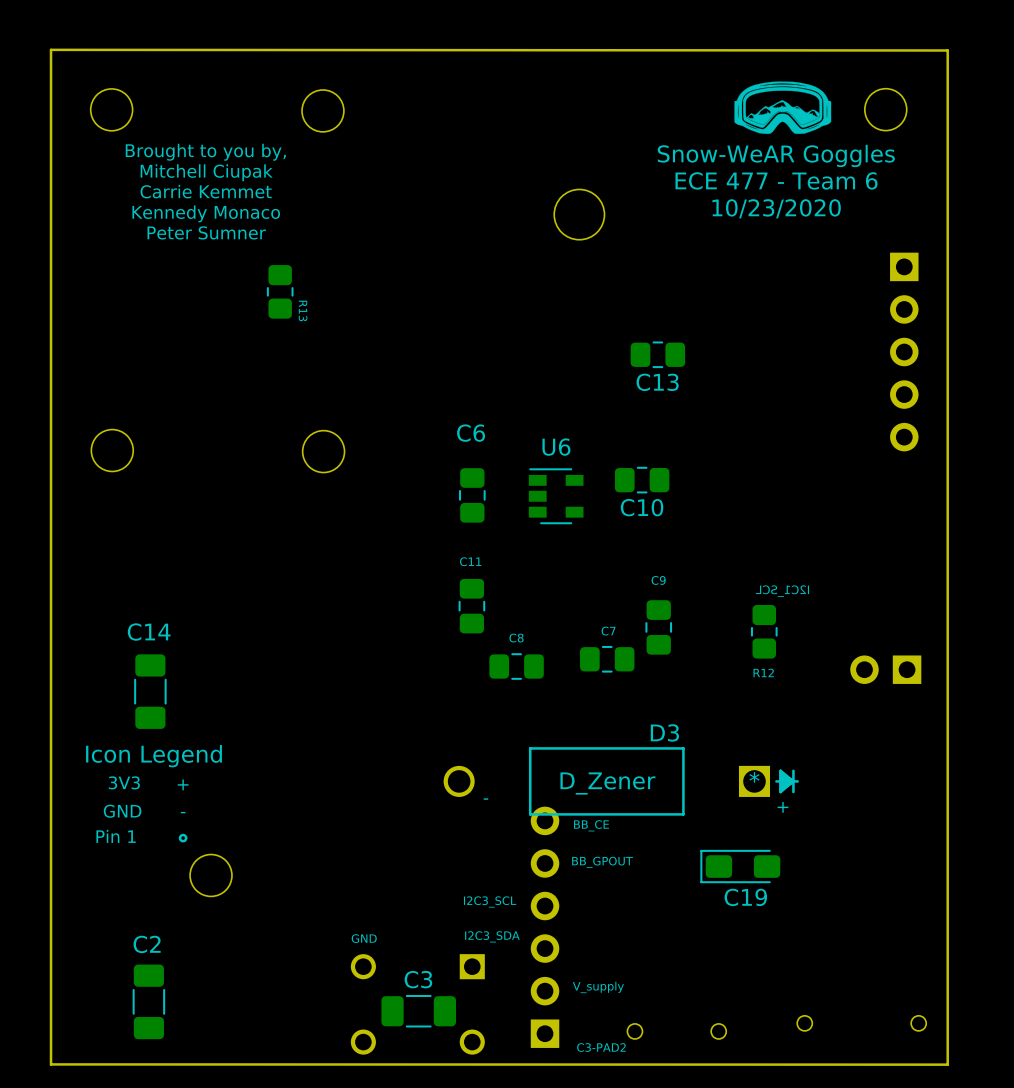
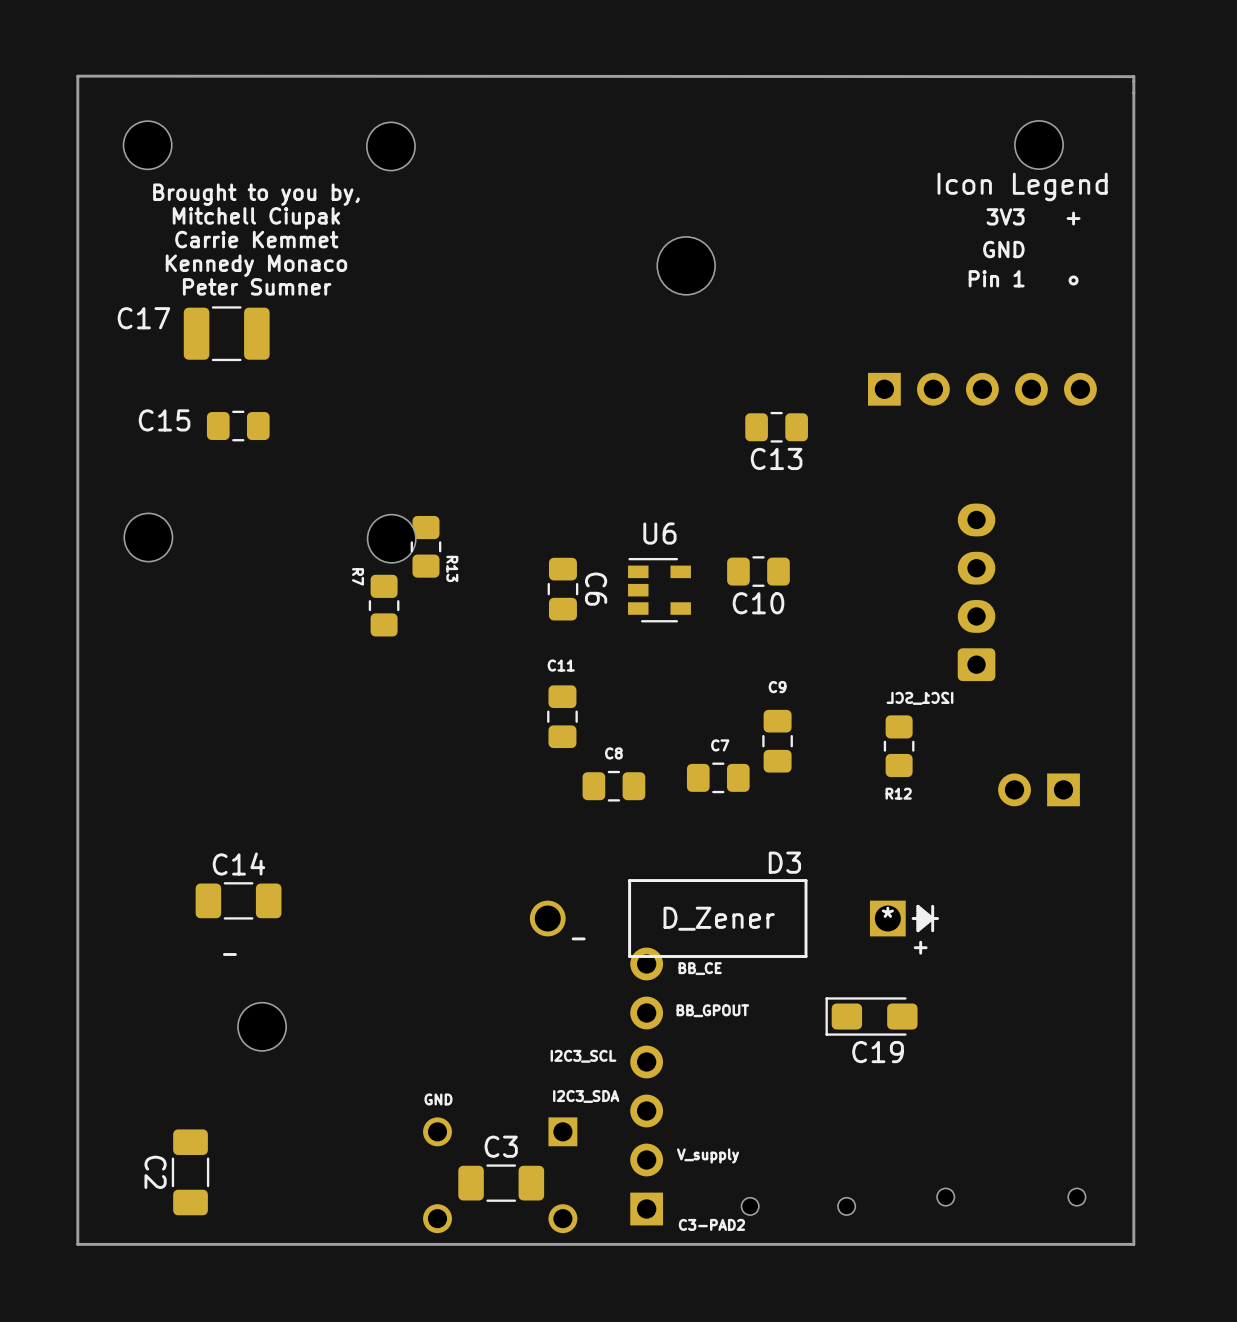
board edge: (51, 49) (947, 50) (947, 1064) (51, 1064) -> (77, 76) (1133, 76) (1133, 1244) (77, 1244)
drawing: [734, 81, 832, 134] -> none
text: none -> Icon Legend (1022, 186)
text: Snow-WeAR Goggles (776, 155) -> none
text: none -> 3V3 (1005, 216)
text: none -> + (1073, 218)
text: ECE 477 - Team 6 (776, 180) -> none
text: none -> GND (1003, 249)
text: 10/23/2020 (776, 208) -> none
drawing: none -> [1068, 275, 1079, 286]
text: none -> Pin 1 (996, 278)
C17: none -> (226, 333)
R13 position: (280, 291) -> (425, 546)
part rotation: 0° (904, 352) -> 90° counterclockwise (982, 389)
C15: none -> (238, 426)
C6 name rotation: 0° (471, 433) -> 90° clockwise (596, 589)
C6 name position: C6 (471, 433) -> C6 (596, 589)
part: none -> (976, 592)
R7: none -> (384, 605)
C14 rotation: 0° (150, 691) -> 90° clockwise (238, 900)
C14 position: (150, 691) -> (238, 900)
text: Icon Legend (154, 756) -> none
text: 3V3 (124, 782) -> none
text: + (183, 784) -> none
text: GND (122, 811) -> none
drawing: [178, 833, 188, 843] -> none
text: Pin 1 (116, 836) -> none
C2 name rotation: 0° (147, 944) -> 90° clockwise (155, 1172)
C2 name position: C2 (147, 944) -> C2 (155, 1172)

